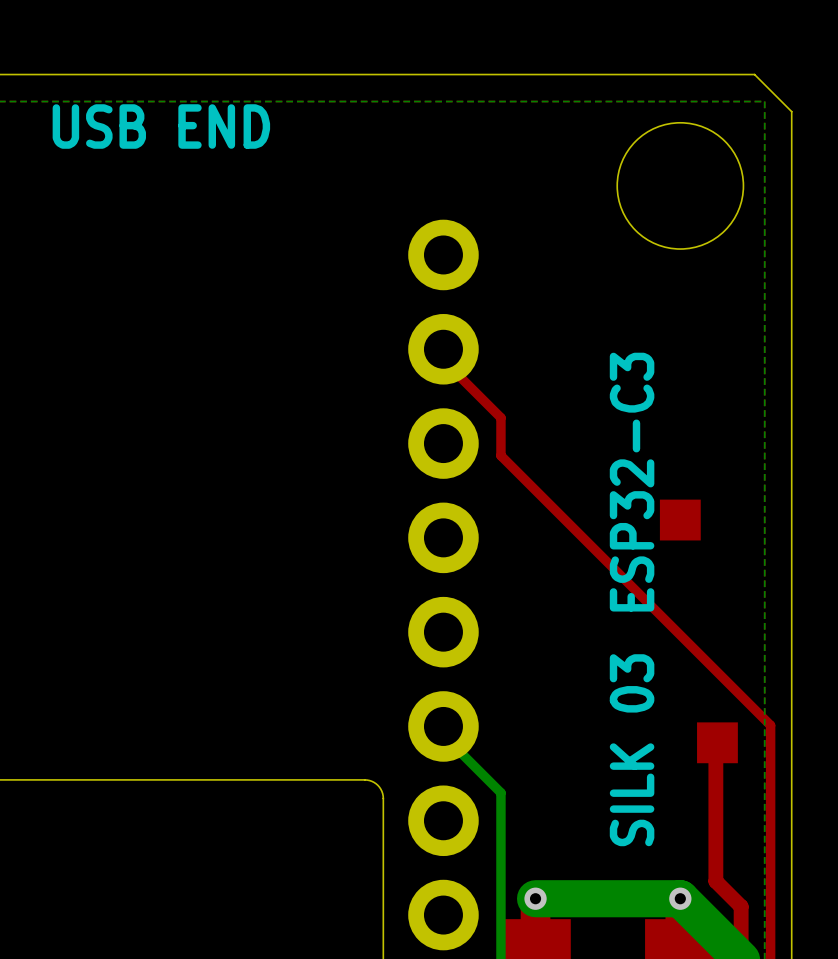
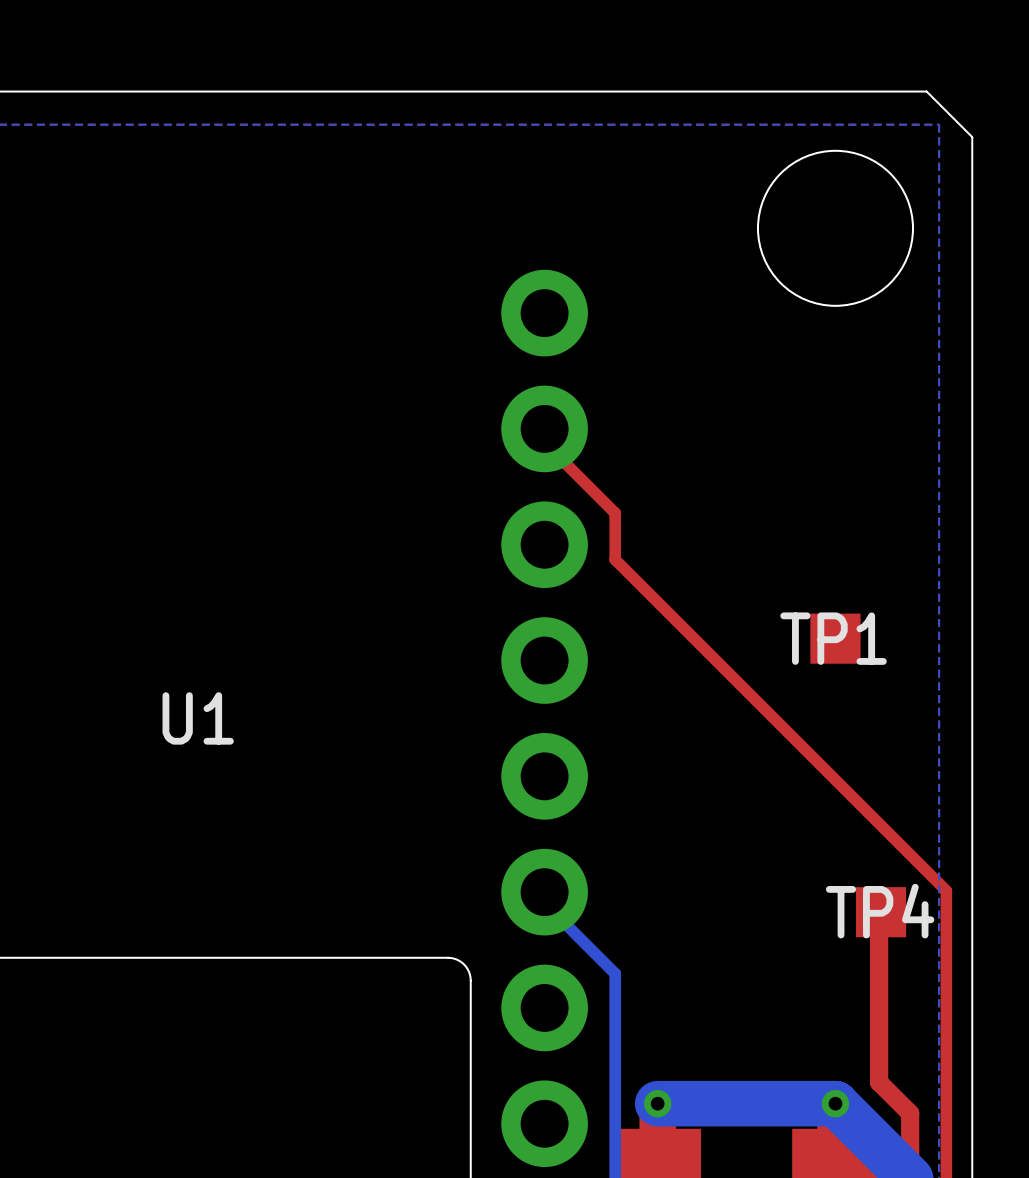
text: USB END (161, 126) -> none
text: ESP32-C3 (632, 482) -> none
text: none -> TP1 (833, 638)
text: none -> U1 (198, 718)
text: none -> TP4 (880, 911)
text: SILK 03 (632, 750) -> none

